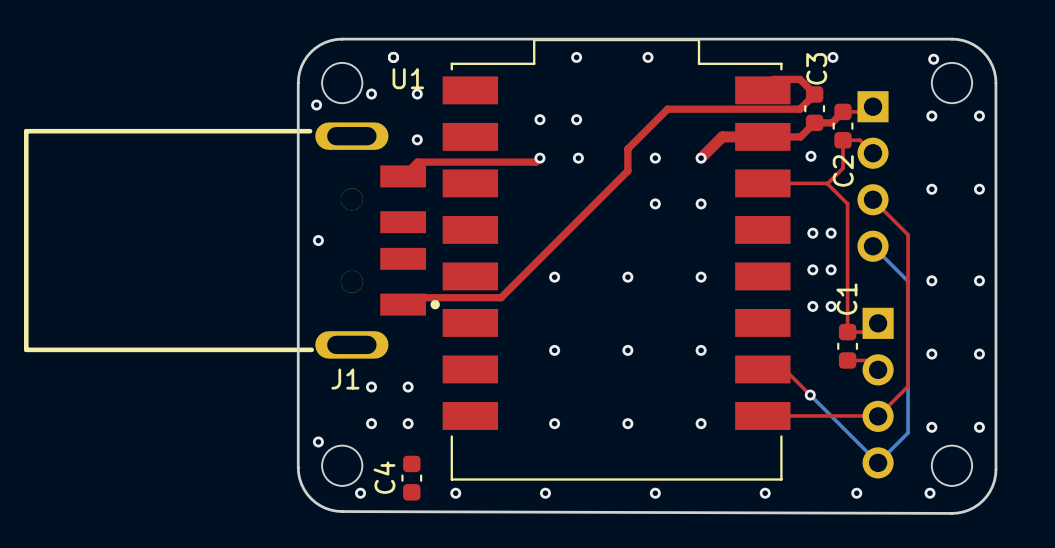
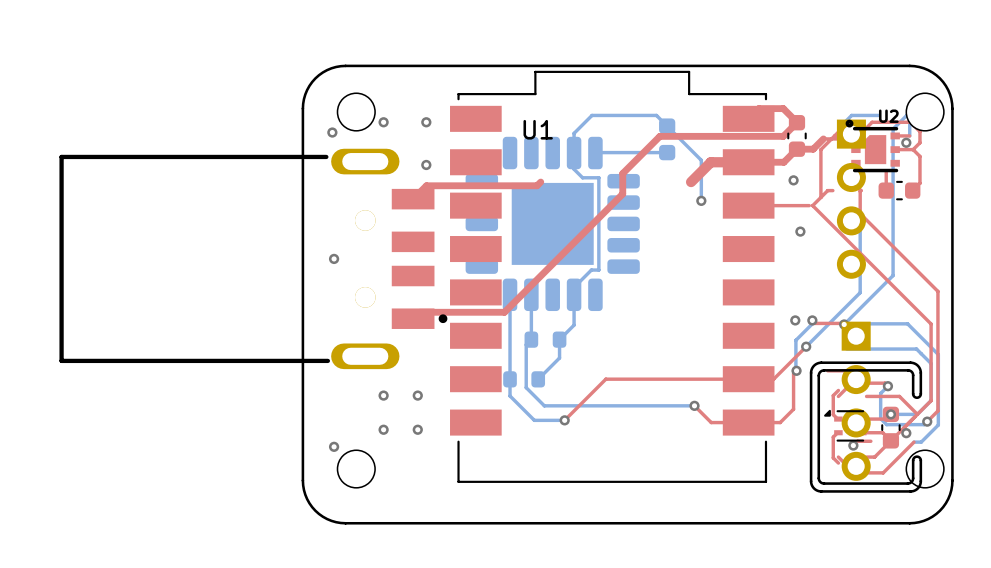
board edge: (342, 39) (952, 39) (963, 40) (978, 48) (992, 66) (995, 83) (995, 469) (994, 480) (986, 496) (968, 510) (952, 513) (342, 511) (330, 510) (315, 502) (304, 489) (298, 467) (298, 83) (301, 66) (311, 51) (325, 42) (342, 39) -> (345, 65) (327, 70) (315, 78) (307, 90) (303, 103) (302, 480) (307, 499) (318, 513) (331, 520) (345, 523) (909, 523) (928, 519) (943, 507) (950, 494) (952, 480) (952, 108) (948, 90) (936, 75) (923, 68) (909, 65) (345, 65)
via: (393, 57) -> none
via: (576, 57) -> none
via: (648, 57) -> none
via: (832, 57) -> none
via: (933, 59) -> none
C3 name: C3 (816, 68) -> none
U1 name position: U1 (408, 78) -> U1 (538, 129)
bottom track: none -> (878, 115) (851, 115) (844, 122)
top track: none -> (844, 122) (844, 125) (820, 149) (820, 197)
top track: none -> (834, 135) (858, 135) (872, 122) (910, 122) (919, 131) (919, 142) (913, 149)
top track: none -> (895, 135) (909, 135)
bottom track: none -> (909, 135) (909, 118) (906, 115) (893, 129) (893, 275) (843, 325)
via: (979, 116) -> none
via: (539, 119) -> none
via: (576, 119) -> none
U2: none -> (872, 145)
top track: none -> (895, 149) (913, 149)
top track: none -> (913, 149) (919, 156) (919, 183) (912, 190)
bottom track: none -> (667, 152) (595, 153)
C2 side: top (843, 126) -> bottom (667, 139)
top track: none -> (855, 163) (855, 185) (861, 190) (860, 213) (937, 291) (937, 410) (927, 421)
top track: none -> (886, 172) (886, 190)
top track: (873, 153) (860, 140) (843, 140) (843, 168) (827, 184) (847, 203) (847, 332) (869, 332) (878, 323) -> none
via: (539, 158) -> none
via: (578, 158) -> none
via: (655, 158) -> none
via: (701, 158) -> none
top track: none -> (832, 190) (827, 190) (812, 205) (931, 324) (931, 400) (874, 457) (866, 457)
part: none -> (899, 190)
bottom track: none -> (701, 200) (701, 160) (656, 115) (592, 115) (574, 133) (574, 169) (582, 177) (598, 177) (598, 270) (591, 270) (574, 287) (574, 325) (559, 339) (559, 358) (538, 379)
via: none -> (701, 200)
via: (931, 189) -> none
via: (979, 189) -> none
bottom track: none -> (860, 213) (860, 292) (806, 346)
top track: (873, 199) (908, 234) (908, 386) (878, 416) (796, 415) -> (796, 370) (793, 373) (793, 409) (780, 422)
part: none -> (552, 223)
via: (655, 203) -> none
via: (701, 203) -> none
via: none -> (800, 231)
via: (812, 233) -> none
via: (831, 233) -> none
bottom track: (873, 246) (908, 281) (908, 432) (878, 462) (810, 395) -> none
via: (812, 269) -> none
via: (831, 269) -> none
via: (554, 277) -> none
via: (627, 277) -> none
via: (701, 277) -> none
bottom track: none -> (510, 294) (510, 396) (534, 420) (564, 420)
bottom track: none -> (531, 294) (531, 339) (526, 344) (526, 387) (544, 405) (694, 405)
via: (931, 280) -> none
via: (979, 280) -> none
top track: none -> (812, 323) (844, 324)
bottom track: none -> (812, 323) (795, 340) (796, 370)
bottom track: none -> (844, 323) (907, 323) (938, 354) (938, 425) (921, 442) (914, 442)
via: none -> (844, 324)
part: none -> (545, 339)
via: none -> (806, 346)
bottom track: none -> (846, 349) (916, 349) (931, 363) (931, 400) (917, 414) (890, 414)
C1: (847, 346) -> none
via: (554, 350) -> none
via: (627, 350) -> none
via: (701, 350) -> none
via: (931, 354) -> none
via: (979, 354) -> none
via: none -> (796, 370)
part: none -> (524, 379)
top track: none -> (748, 379) (605, 379) (564, 420)
top track: (784, 369) (810, 395) -> (769, 379) (773, 379) (806, 346)
top track: none -> (887, 386) (884, 383) (851, 383) (838, 396)
bottom track: none -> (887, 386) (880, 393) (880, 418) (886, 424) (924, 424) (927, 421)
via: none -> (887, 386)
J1 name: J1 (345, 379) -> none
top track: none -> (838, 390) (833, 395) (833, 414) (838, 419)
top track: none -> (866, 396) (899, 396) (917, 414)
via: (810, 395) -> none
top track: none -> (694, 405) (711, 422) (748, 422)
via: none -> (694, 405)
top track: none -> (890, 414) (886, 419) (862, 419)
via: none -> (890, 414)
part: none -> (845, 425)
part: none -> (890, 427)
via position: (554, 423) -> (564, 420)
via: (627, 423) -> none
via: (701, 423) -> none
top track: none -> (838, 432) (833, 437) (833, 457) (838, 463)
top track: none -> (862, 432) (882, 432) (890, 440)
via position: (979, 427) -> (927, 421)
top track: none -> (870, 441) (857, 441) (853, 445)
top track: none -> (914, 442) (883, 472) (854, 472) (838, 457)
via: none -> (853, 445)
C4: (411, 478) -> none
board edge: none -> (811, 481) (813, 487) (819, 491) (910, 491) (917, 488) (920, 482) (920, 460) (917, 456) (913, 459) (913, 479) (909, 483) (824, 483) (819, 481) (818, 375) (823, 370) (909, 370) (913, 374) (913, 394) (917, 397) (920, 393) (920, 371) (917, 365) (910, 362) (821, 362) (814, 365) (811, 372) (811, 481)
via: (360, 493) -> none
via: (455, 493) -> none
via: (545, 493) -> none
via: (655, 493) -> none
via: (765, 493) -> none
via: (856, 493) -> none
via: (930, 493) -> none

